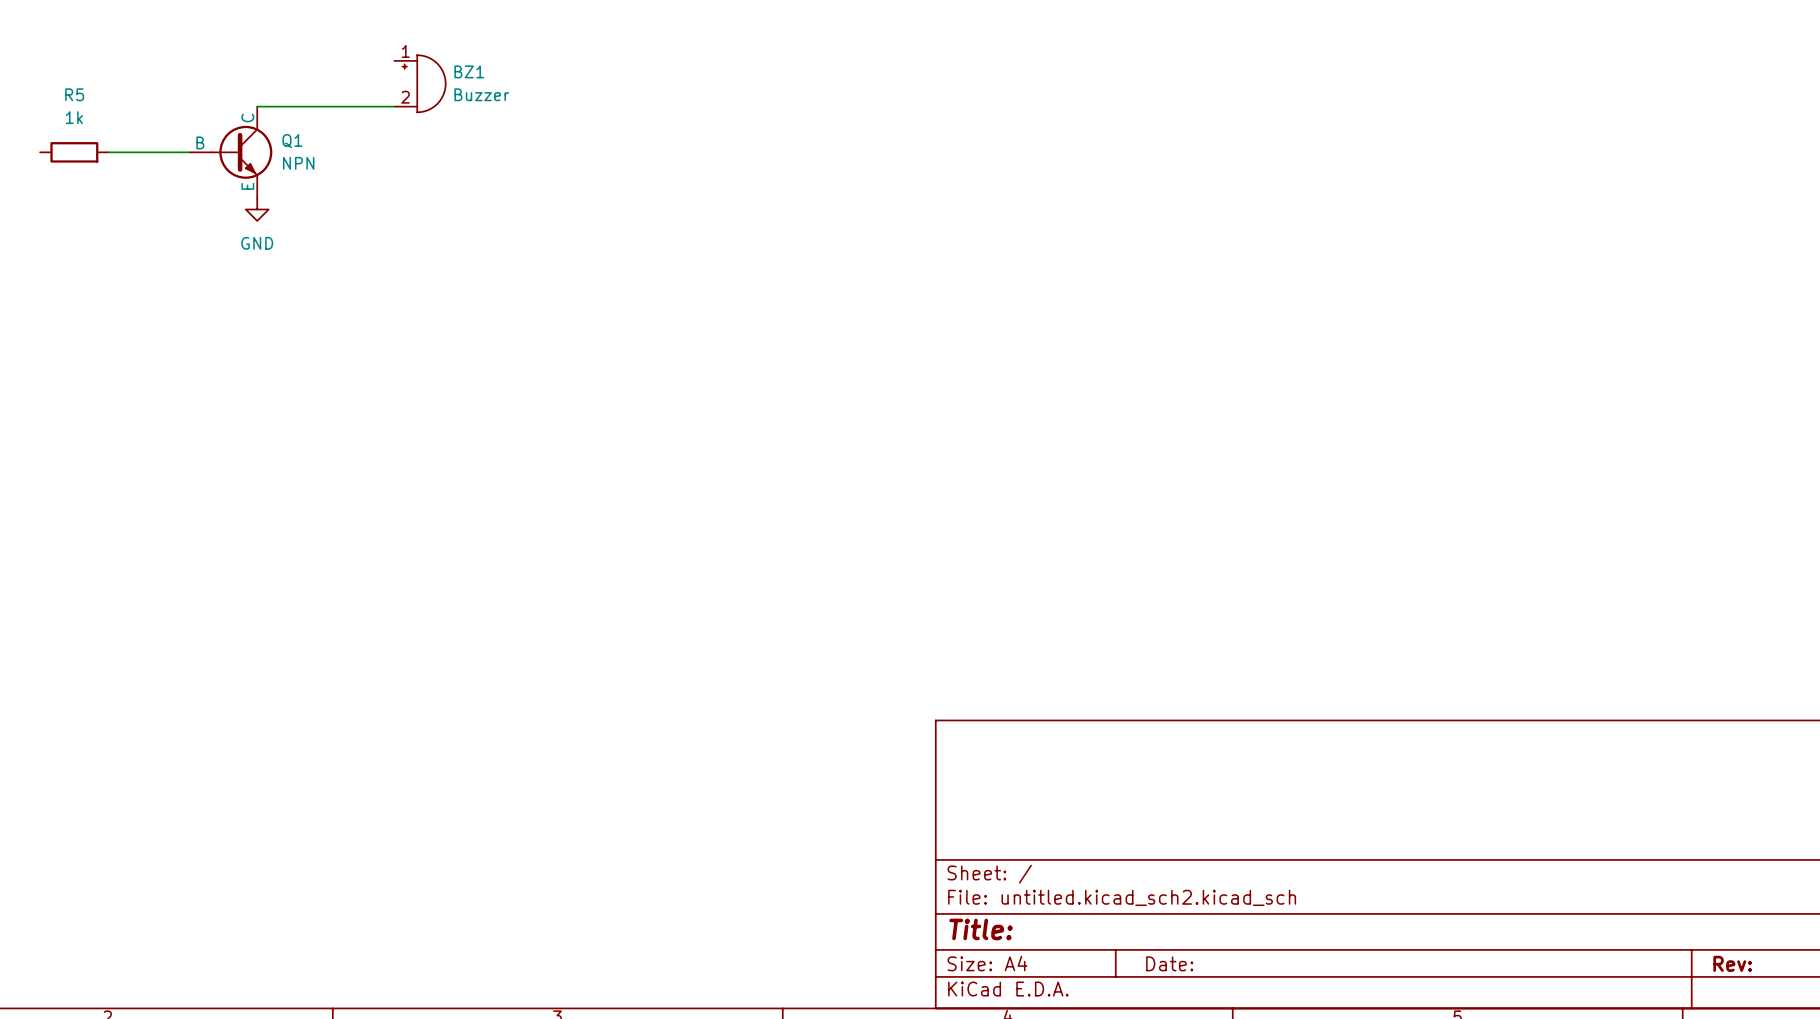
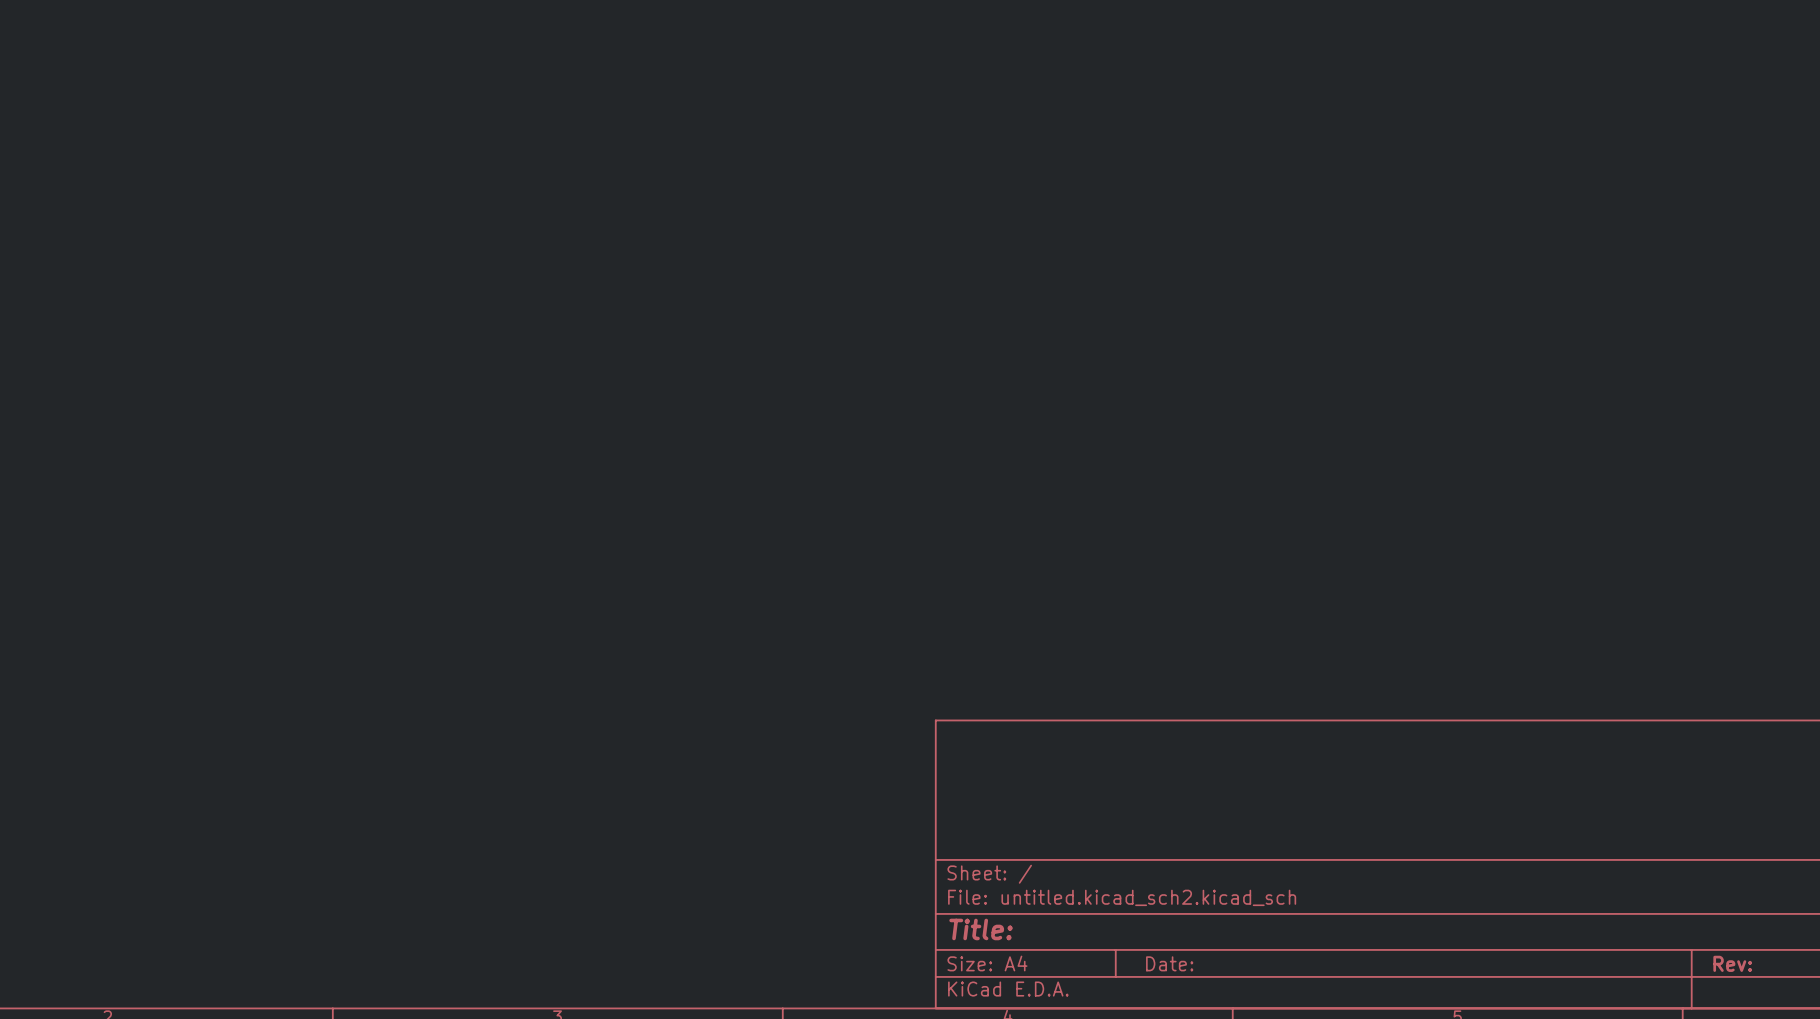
BZ1: Buzzer (420, 83) -> none
wire: (257, 106) (394, 106) -> none
R5: 1k (74, 152) -> none
wire: (108, 152) (188, 152) -> none
Q1: NPN (230, 152) -> none
power symbol: GND (257, 209) -> none

